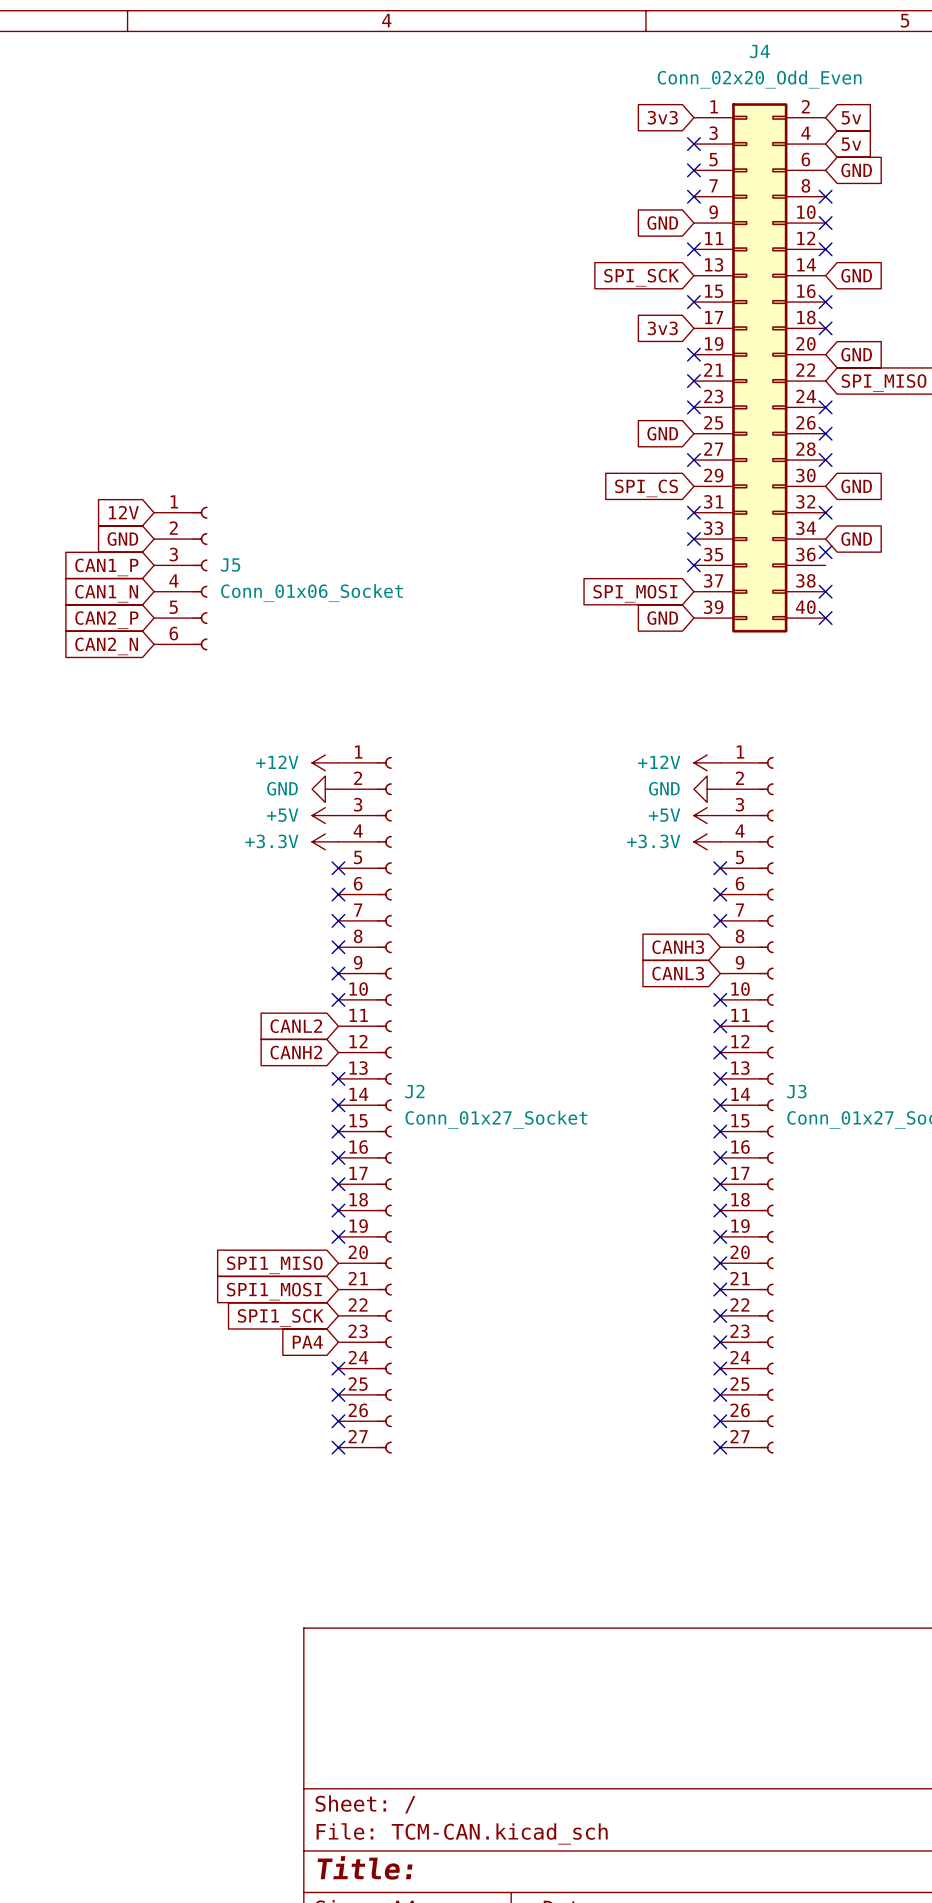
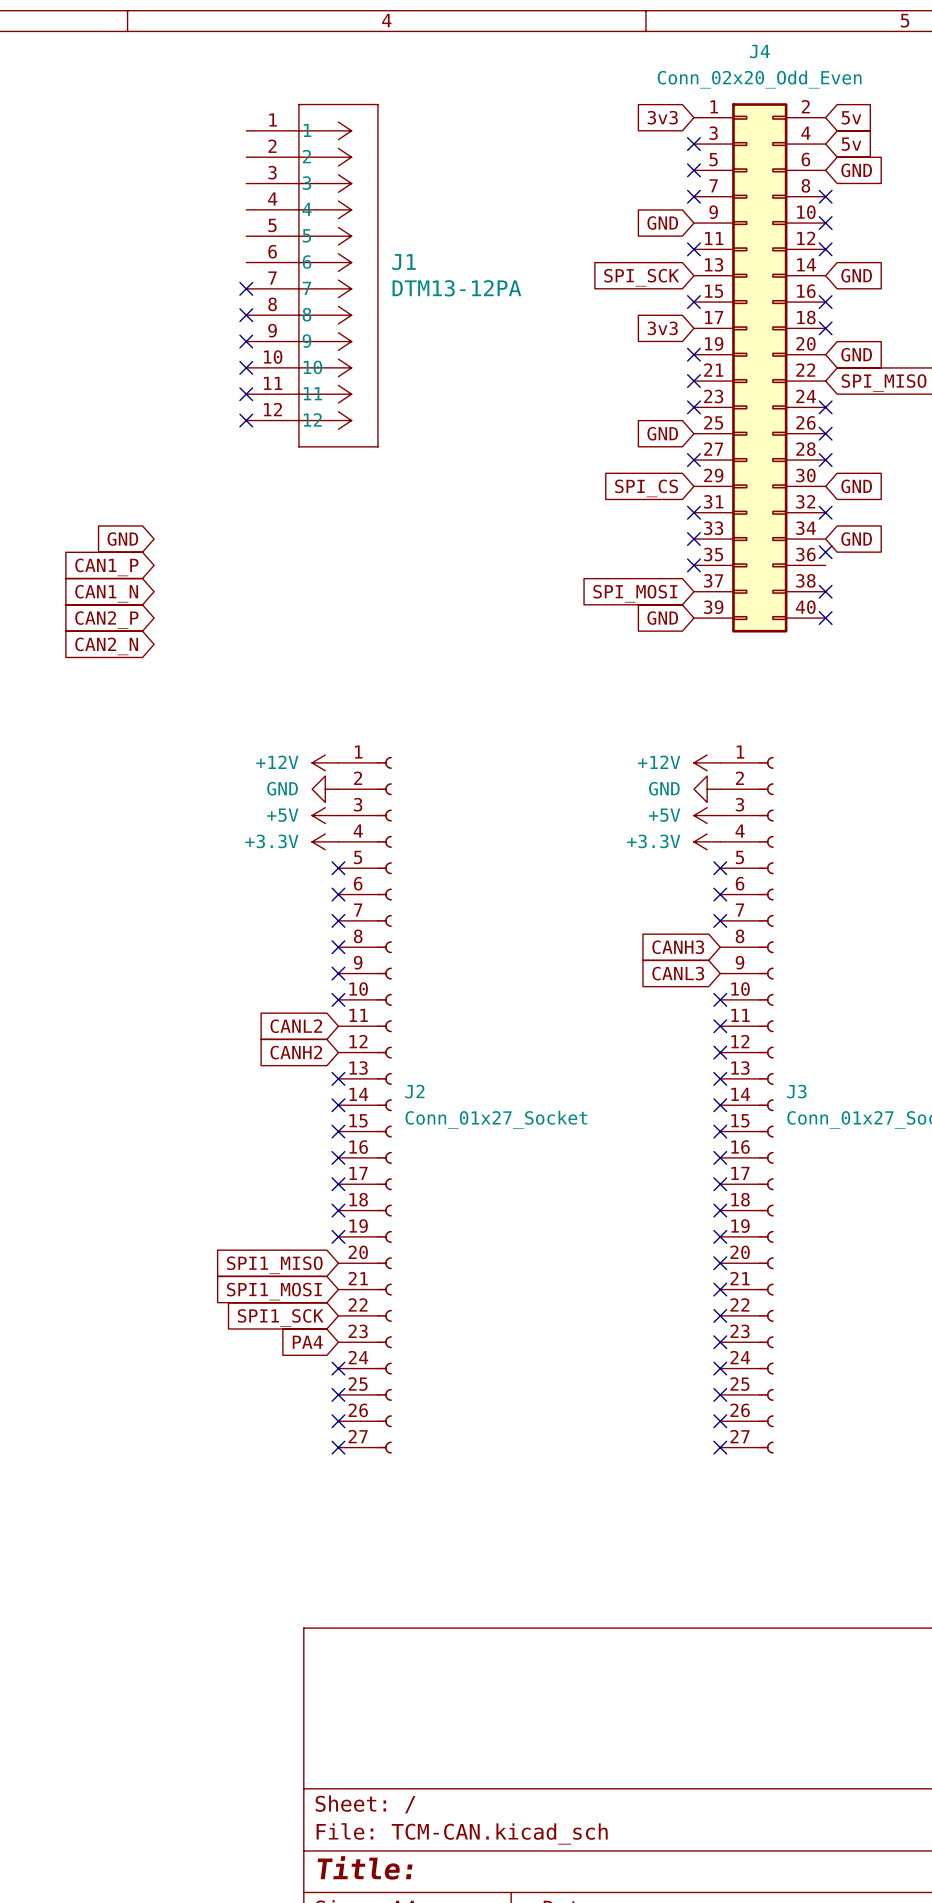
J1: none -> DTM13-12PA (312, 275)
no-connect mark: none -> (246, 288)
no-connect mark: none -> (246, 315)
no-connect mark: none -> (246, 341)
no-connect mark: none -> (246, 367)
no-connect mark: none -> (246, 394)
no-connect mark: none -> (246, 420)
global label: 12V (123, 512) -> none
J5: Conn_01x06_Socket (180, 578) -> none

